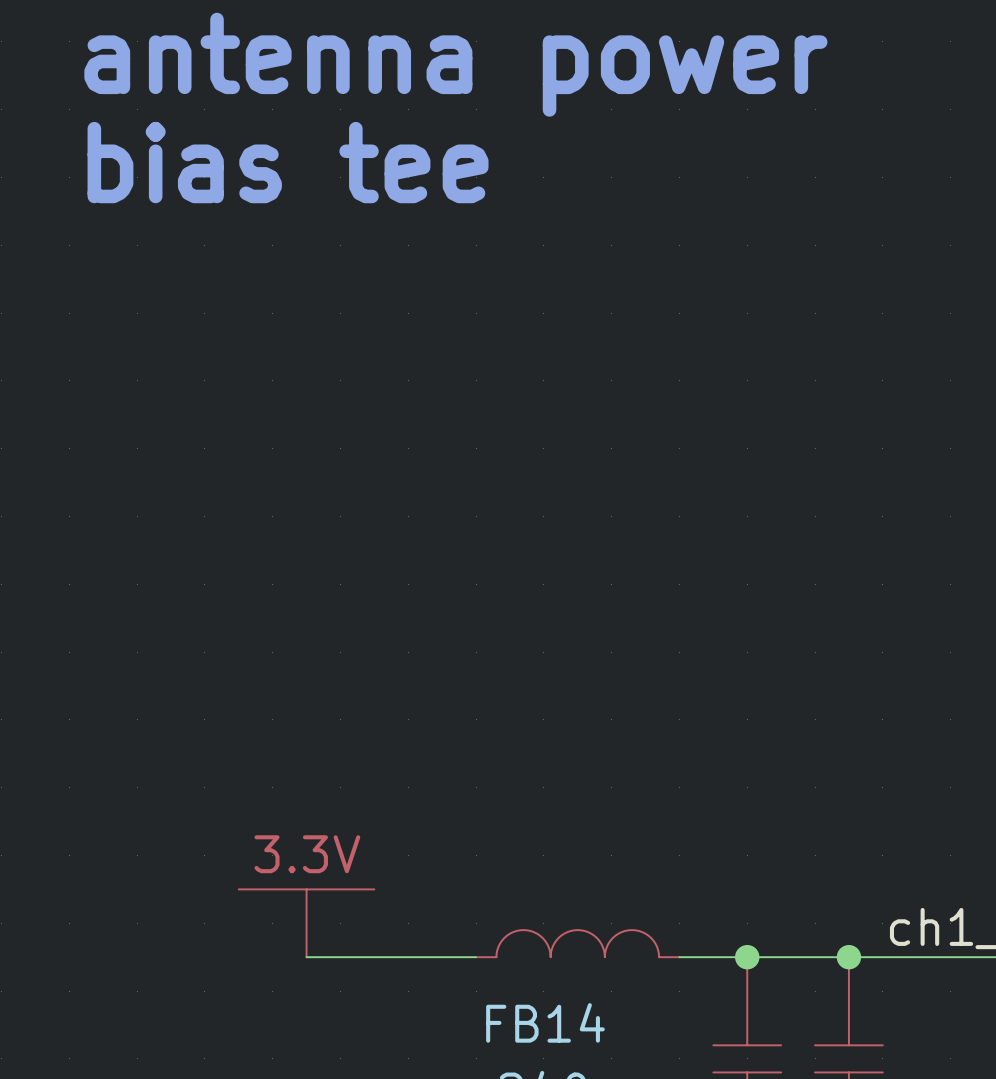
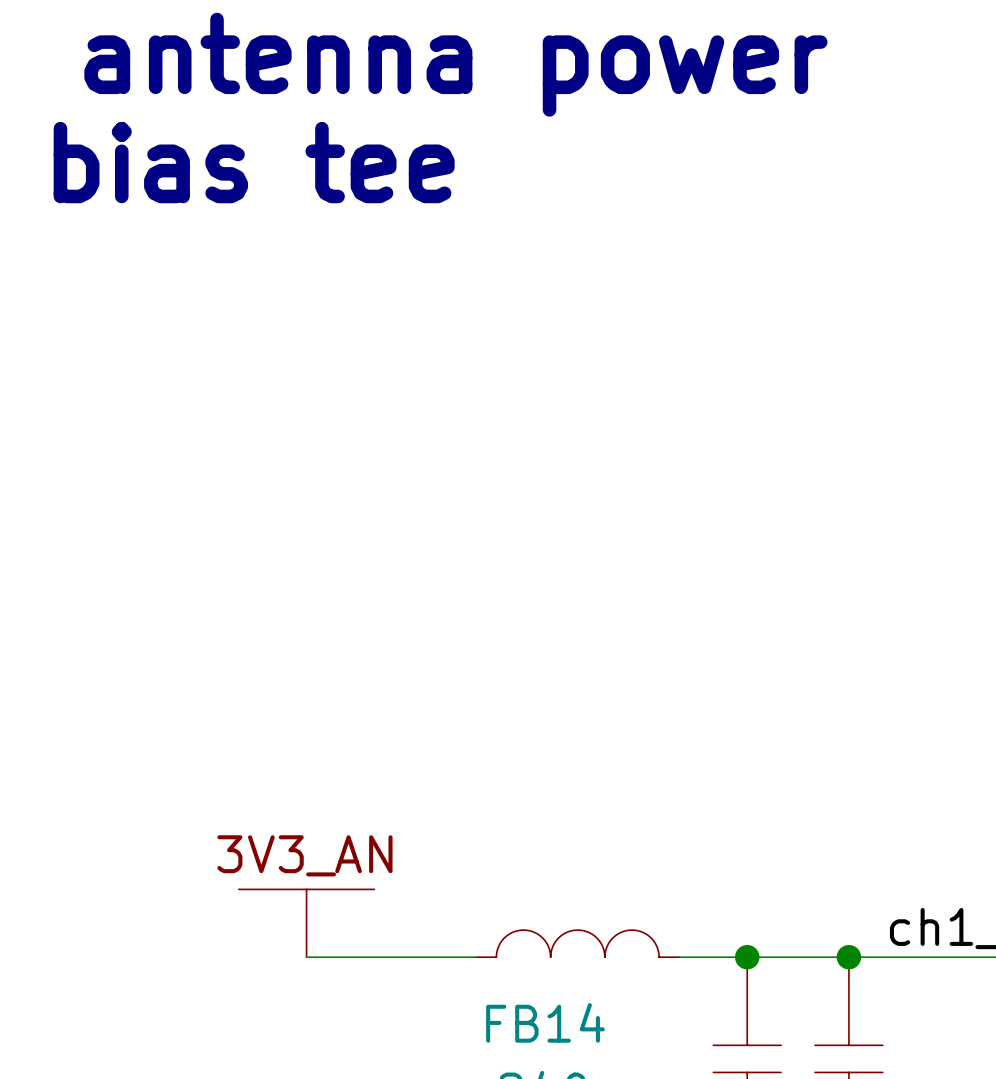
text position: bias tee (288, 162) -> bias tee (254, 162)
power symbol text: 3.3V (307, 854) -> 3V3_AN (304, 855)

